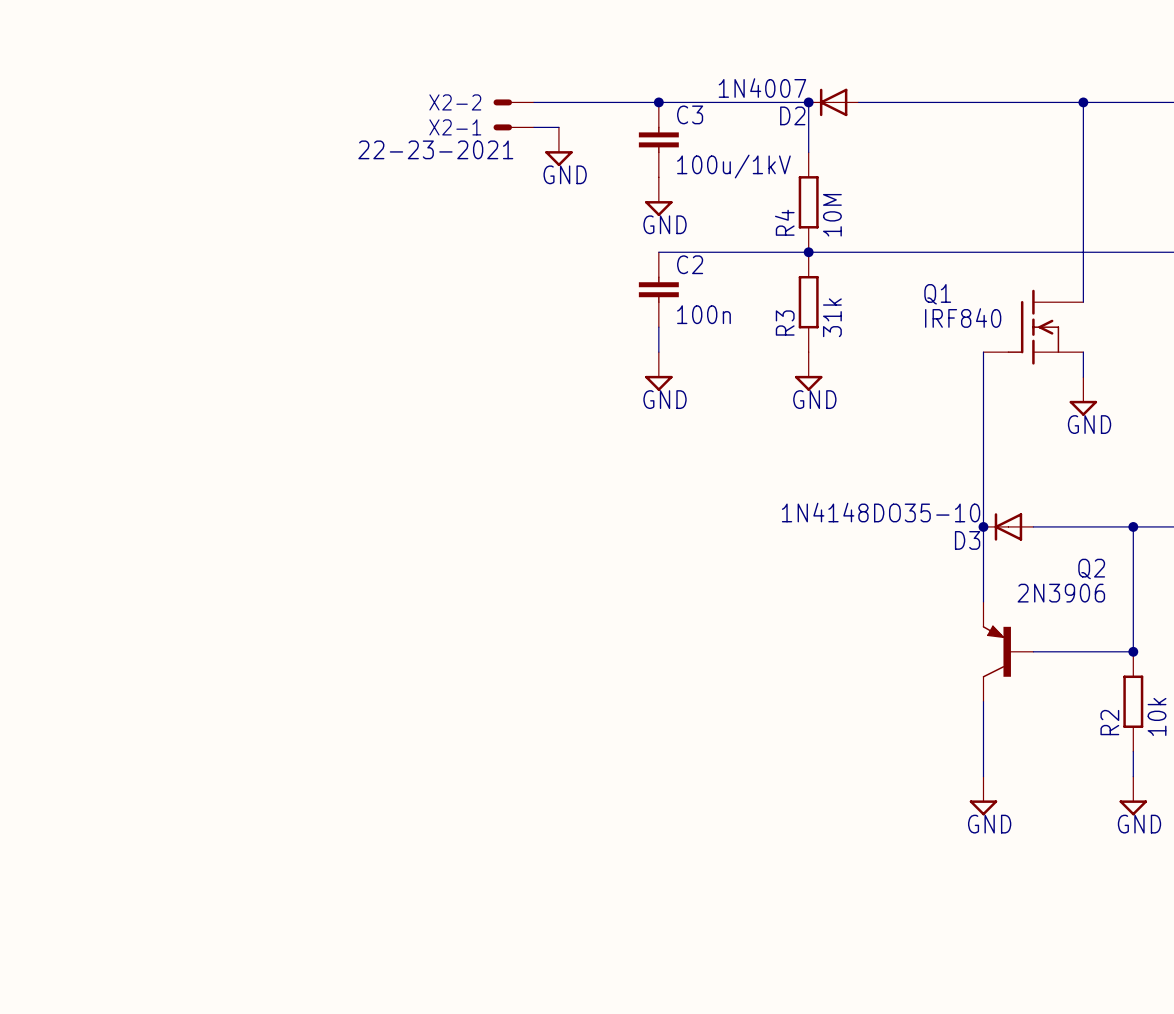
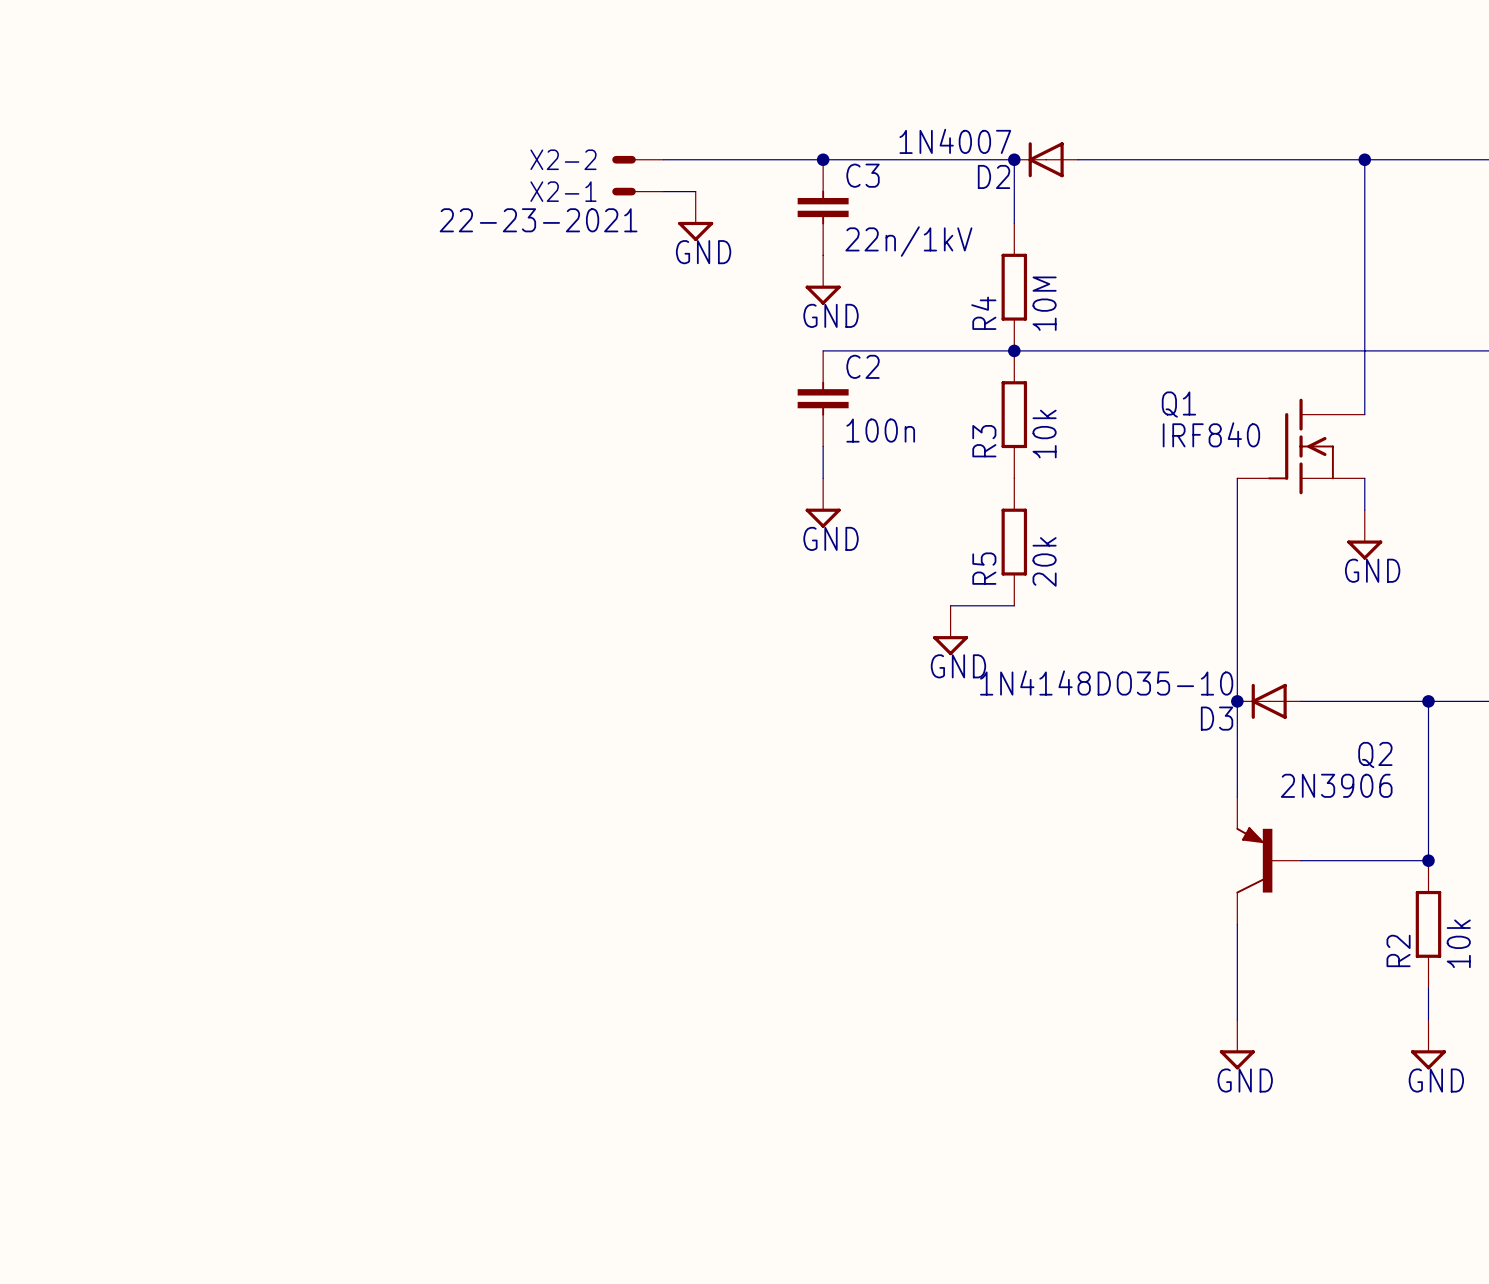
C3 value: 100u/1kV (733, 166) -> 22n/1kV (908, 241)
R3 value: 31k (832, 317) -> 10k (1044, 434)
power symbol position: GND (808, 371) -> GND (950, 630)
R5: none -> 20k (1014, 542)
wire: none -> (950, 605) (1014, 605)

